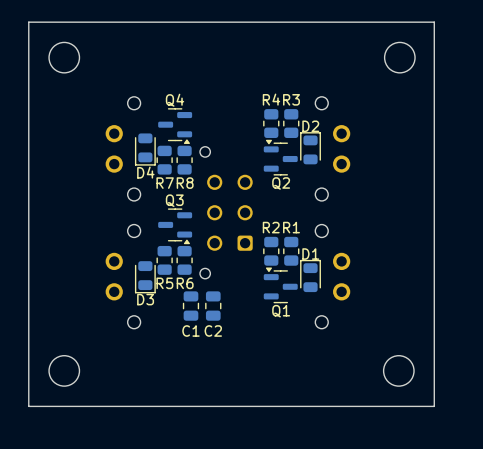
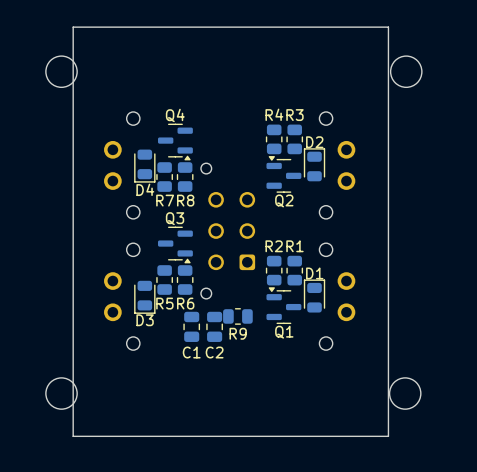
board edge: (434, 22) (28, 22) (28, 406) (434, 406) (434, 22) -> (388, 27) (388, 436) (73, 436) (73, 27) (388, 27)
R9: none -> (237, 316)

